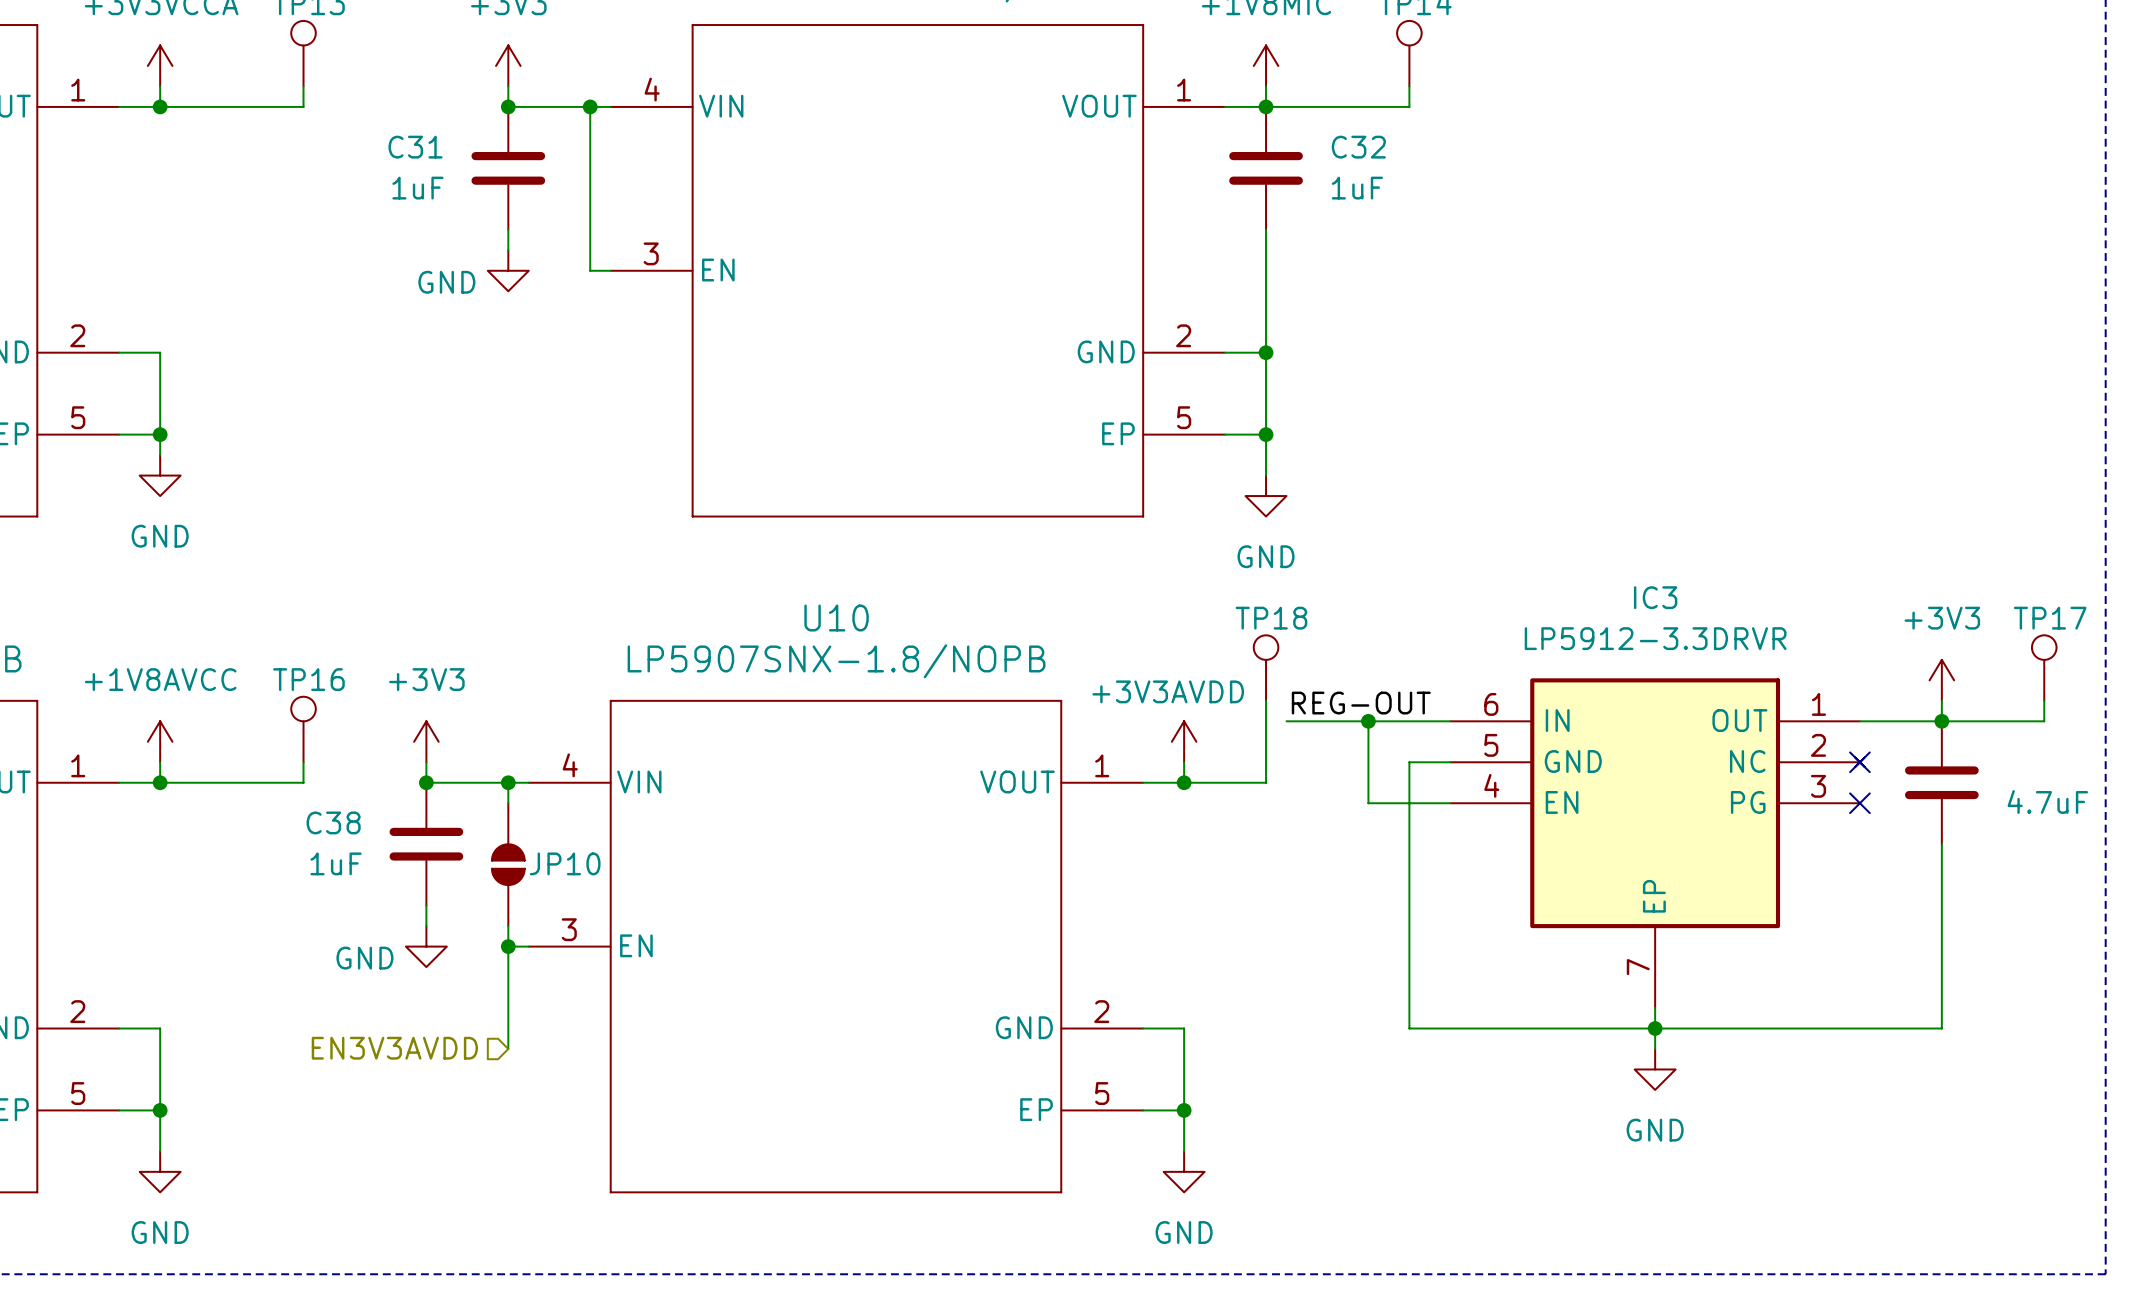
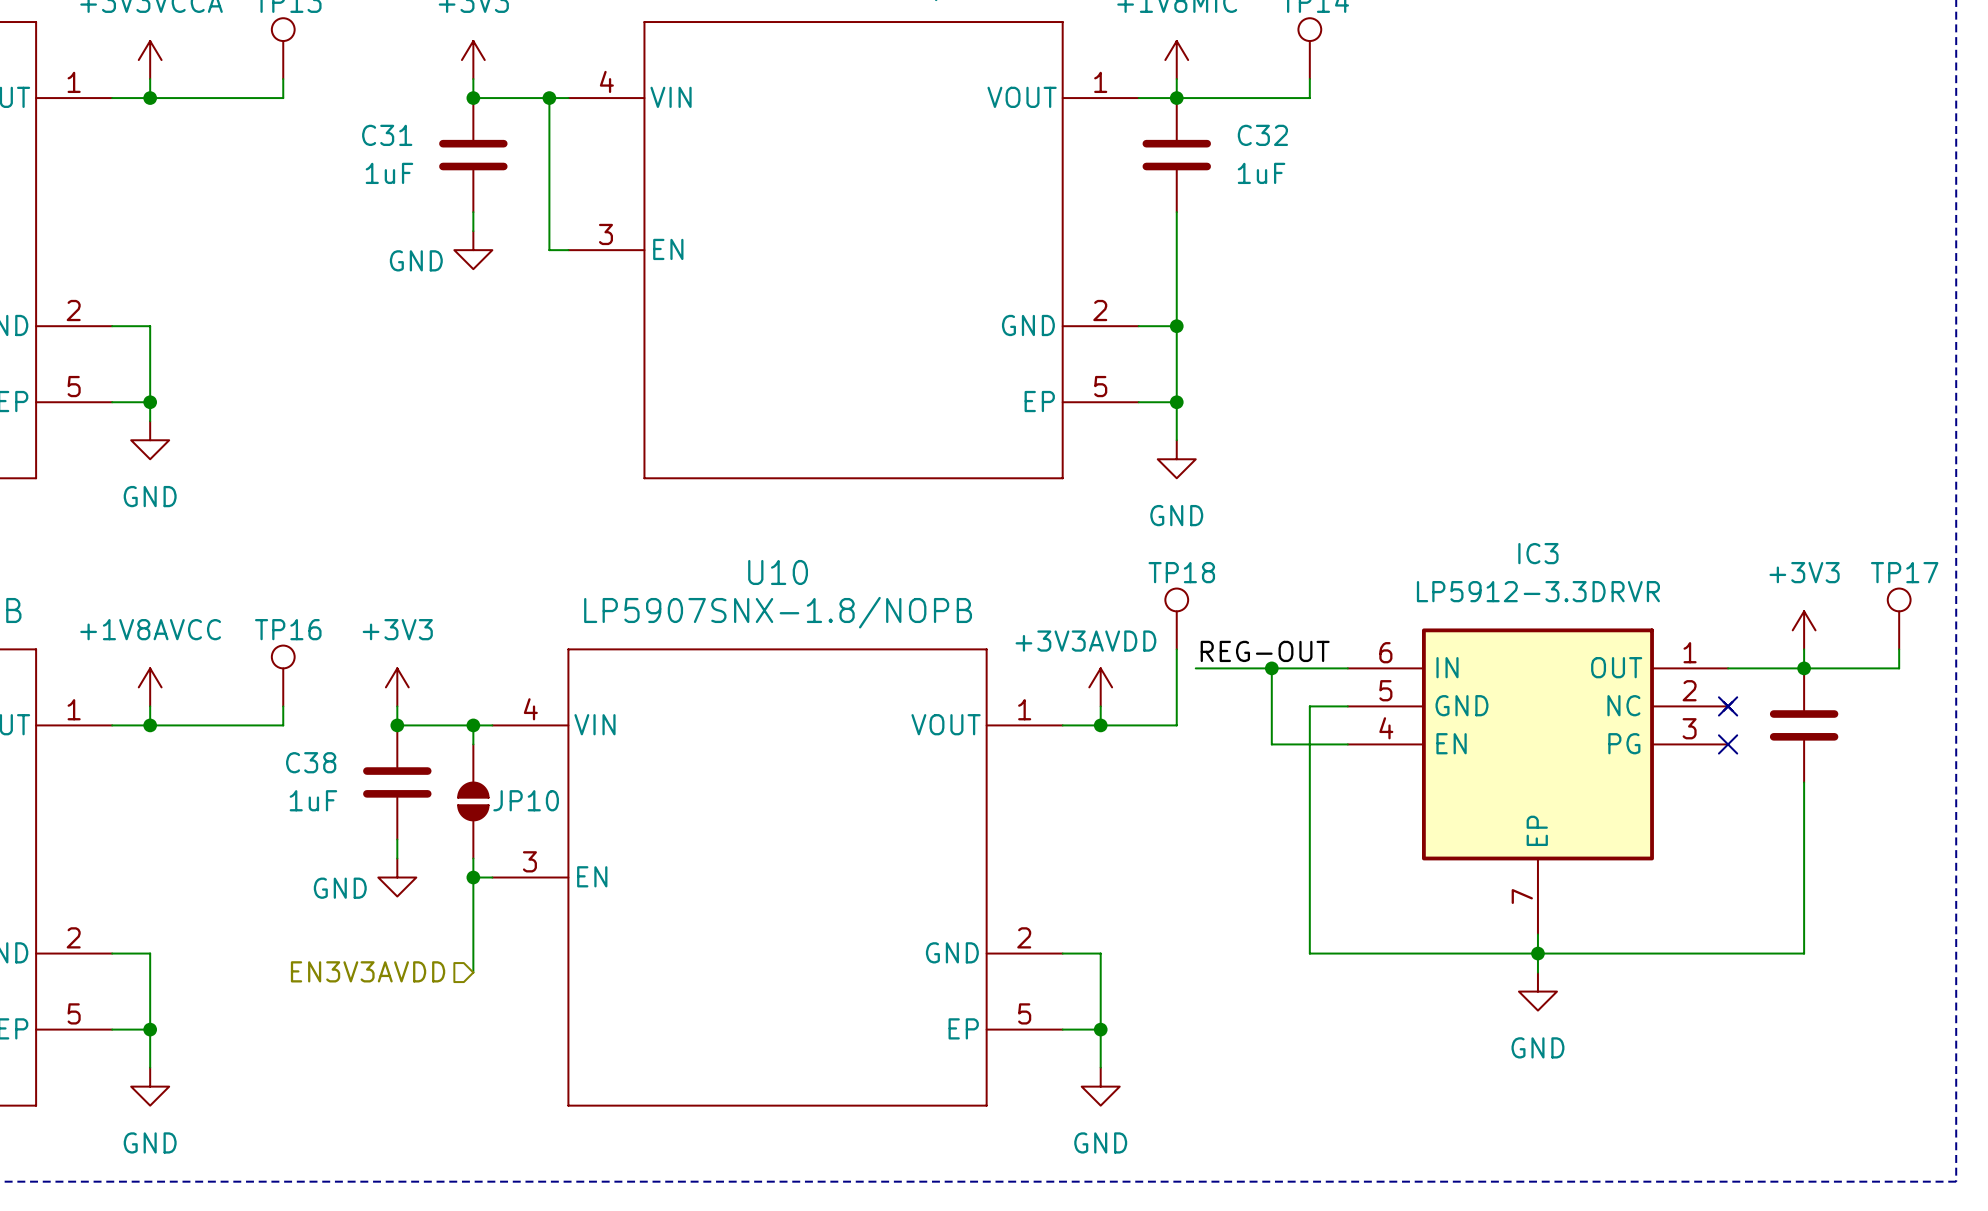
part value: 4.7uF (2047, 801) -> none

